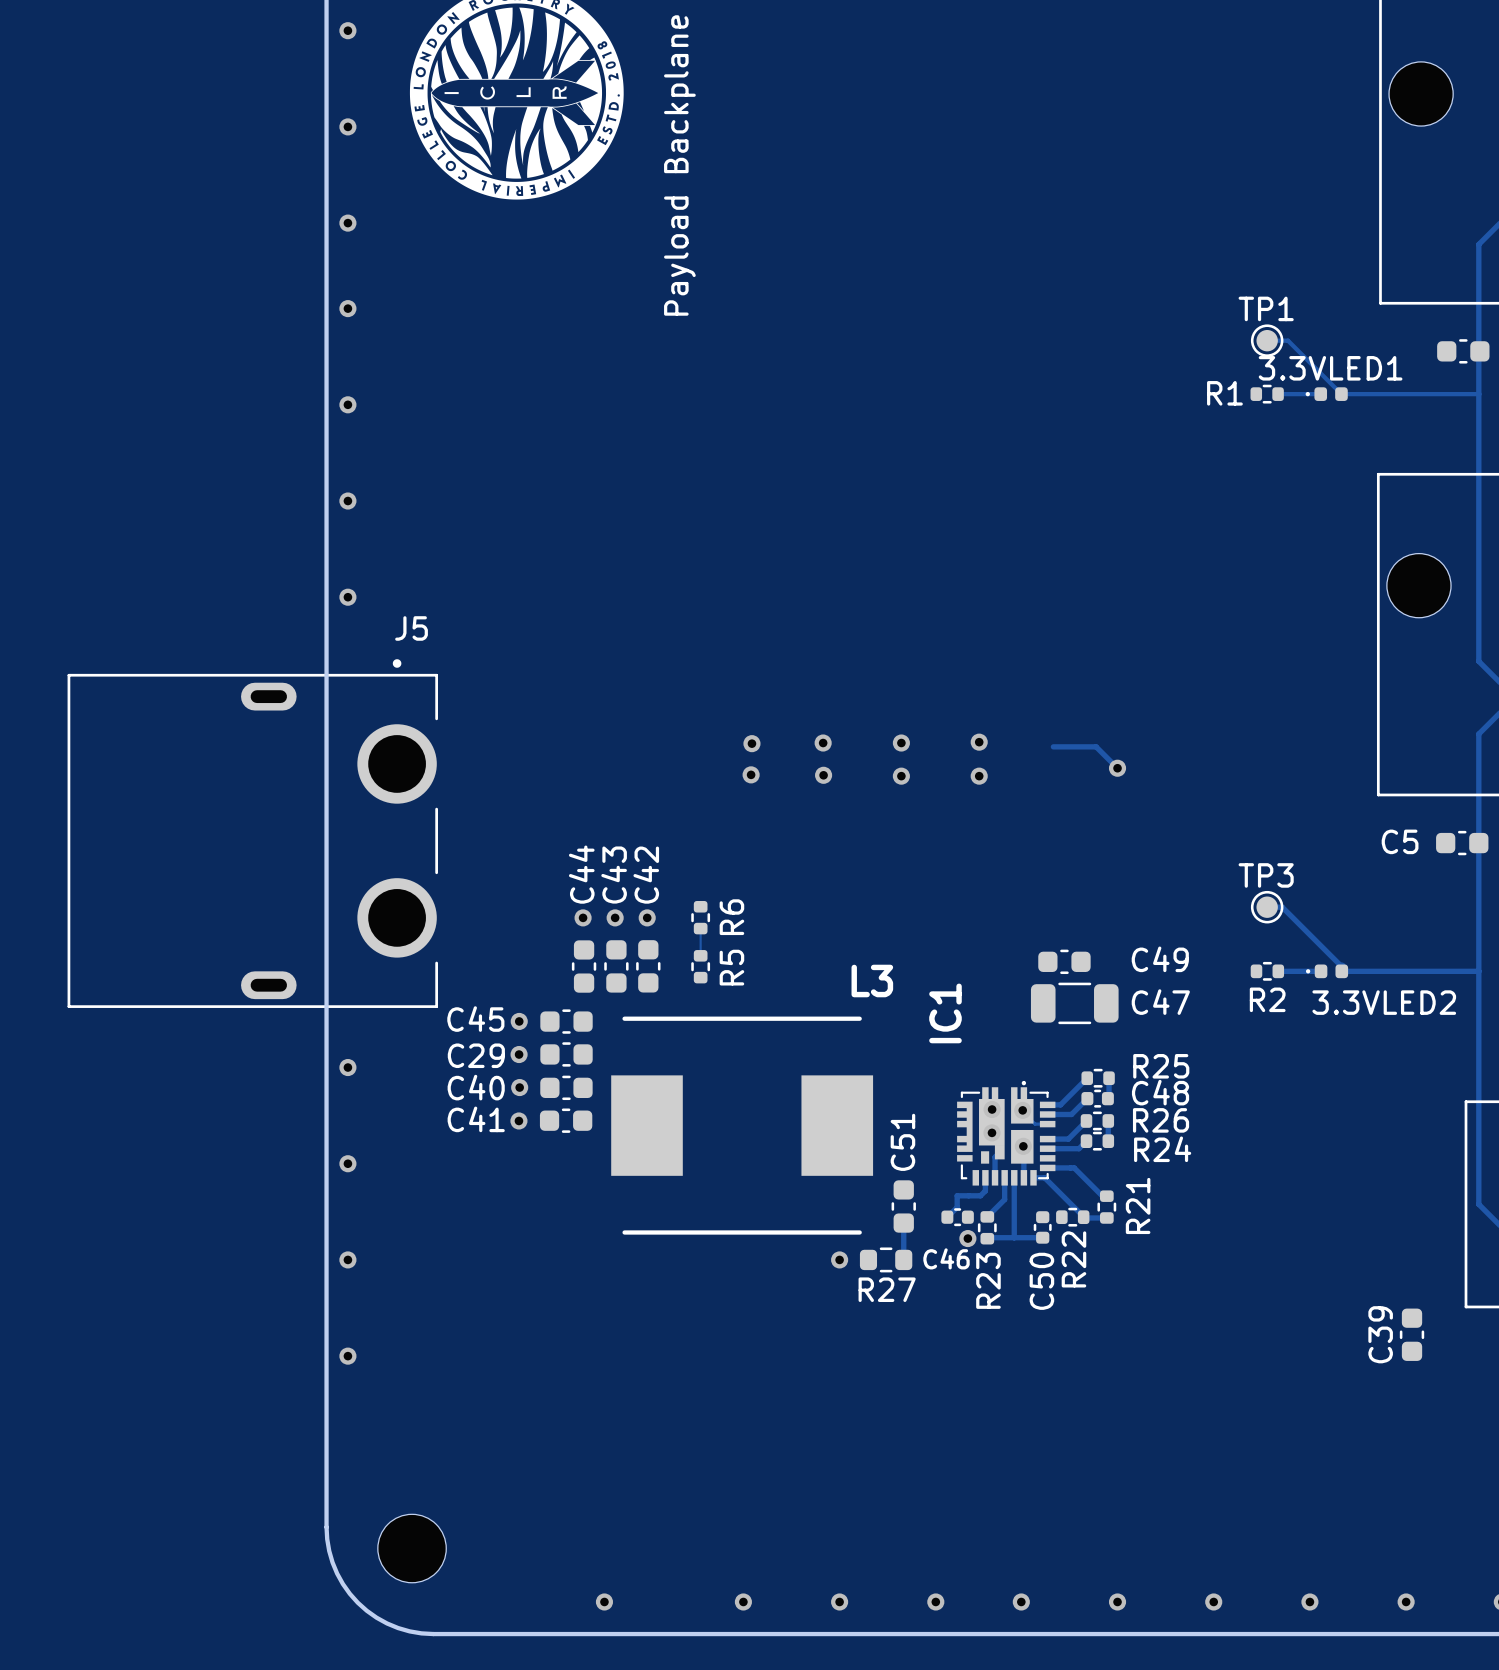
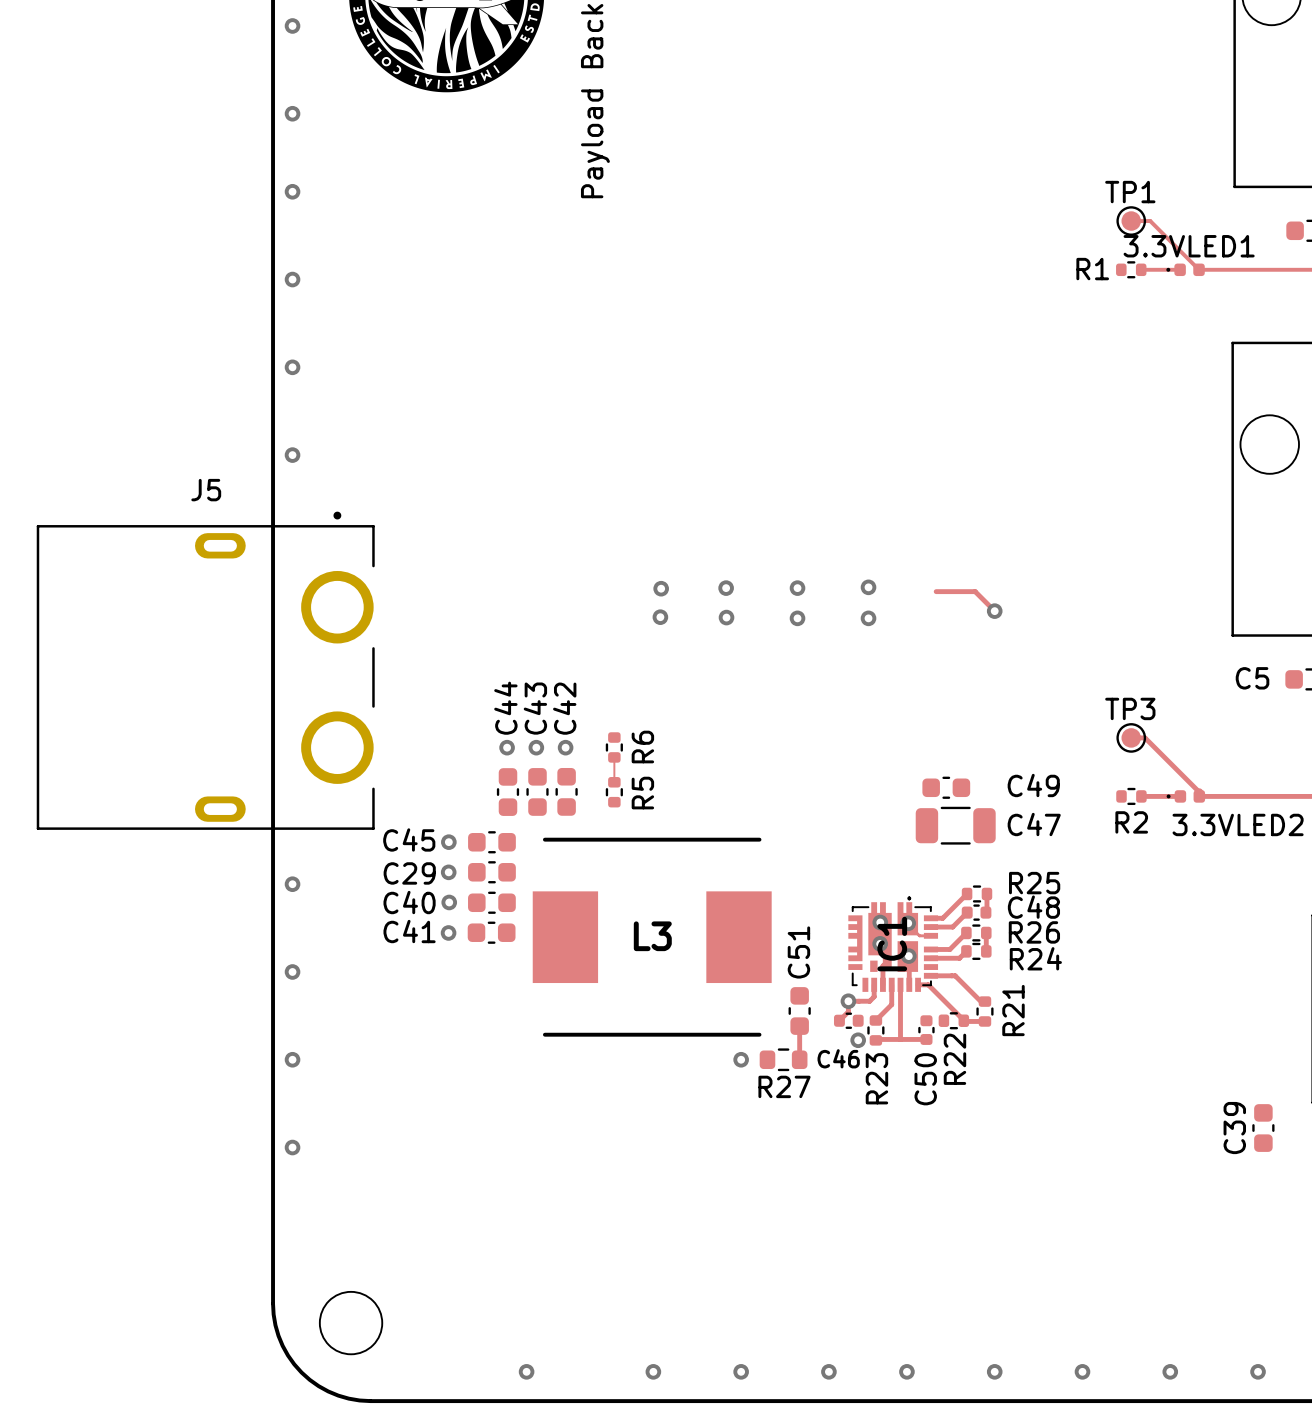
J5 name position: J5 (411, 628) -> J5 (206, 490)
L3 name position: L3 (872, 981) -> L3 (652, 936)
IC1 name position: IC1 (945, 1013) -> IC1 (892, 944)
via: none -> (848, 1001)

